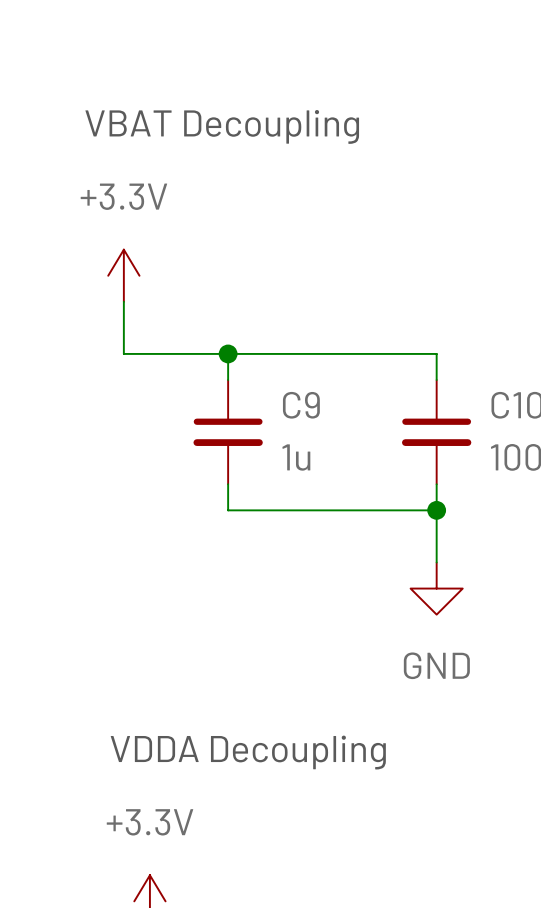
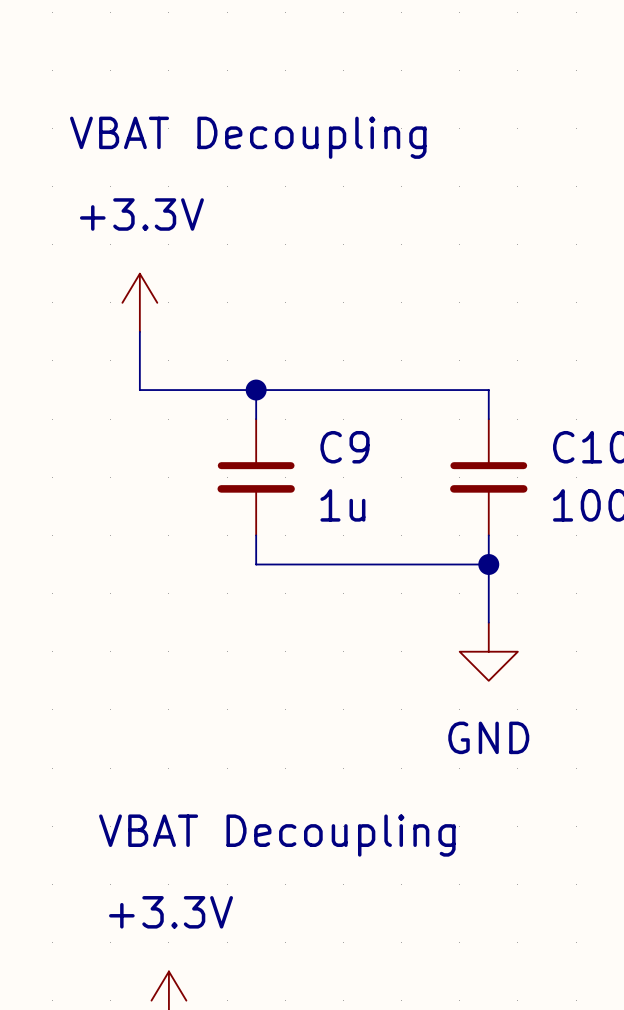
text: VDDA Decoupling (248, 752) -> VBAT Decoupling (277, 835)

